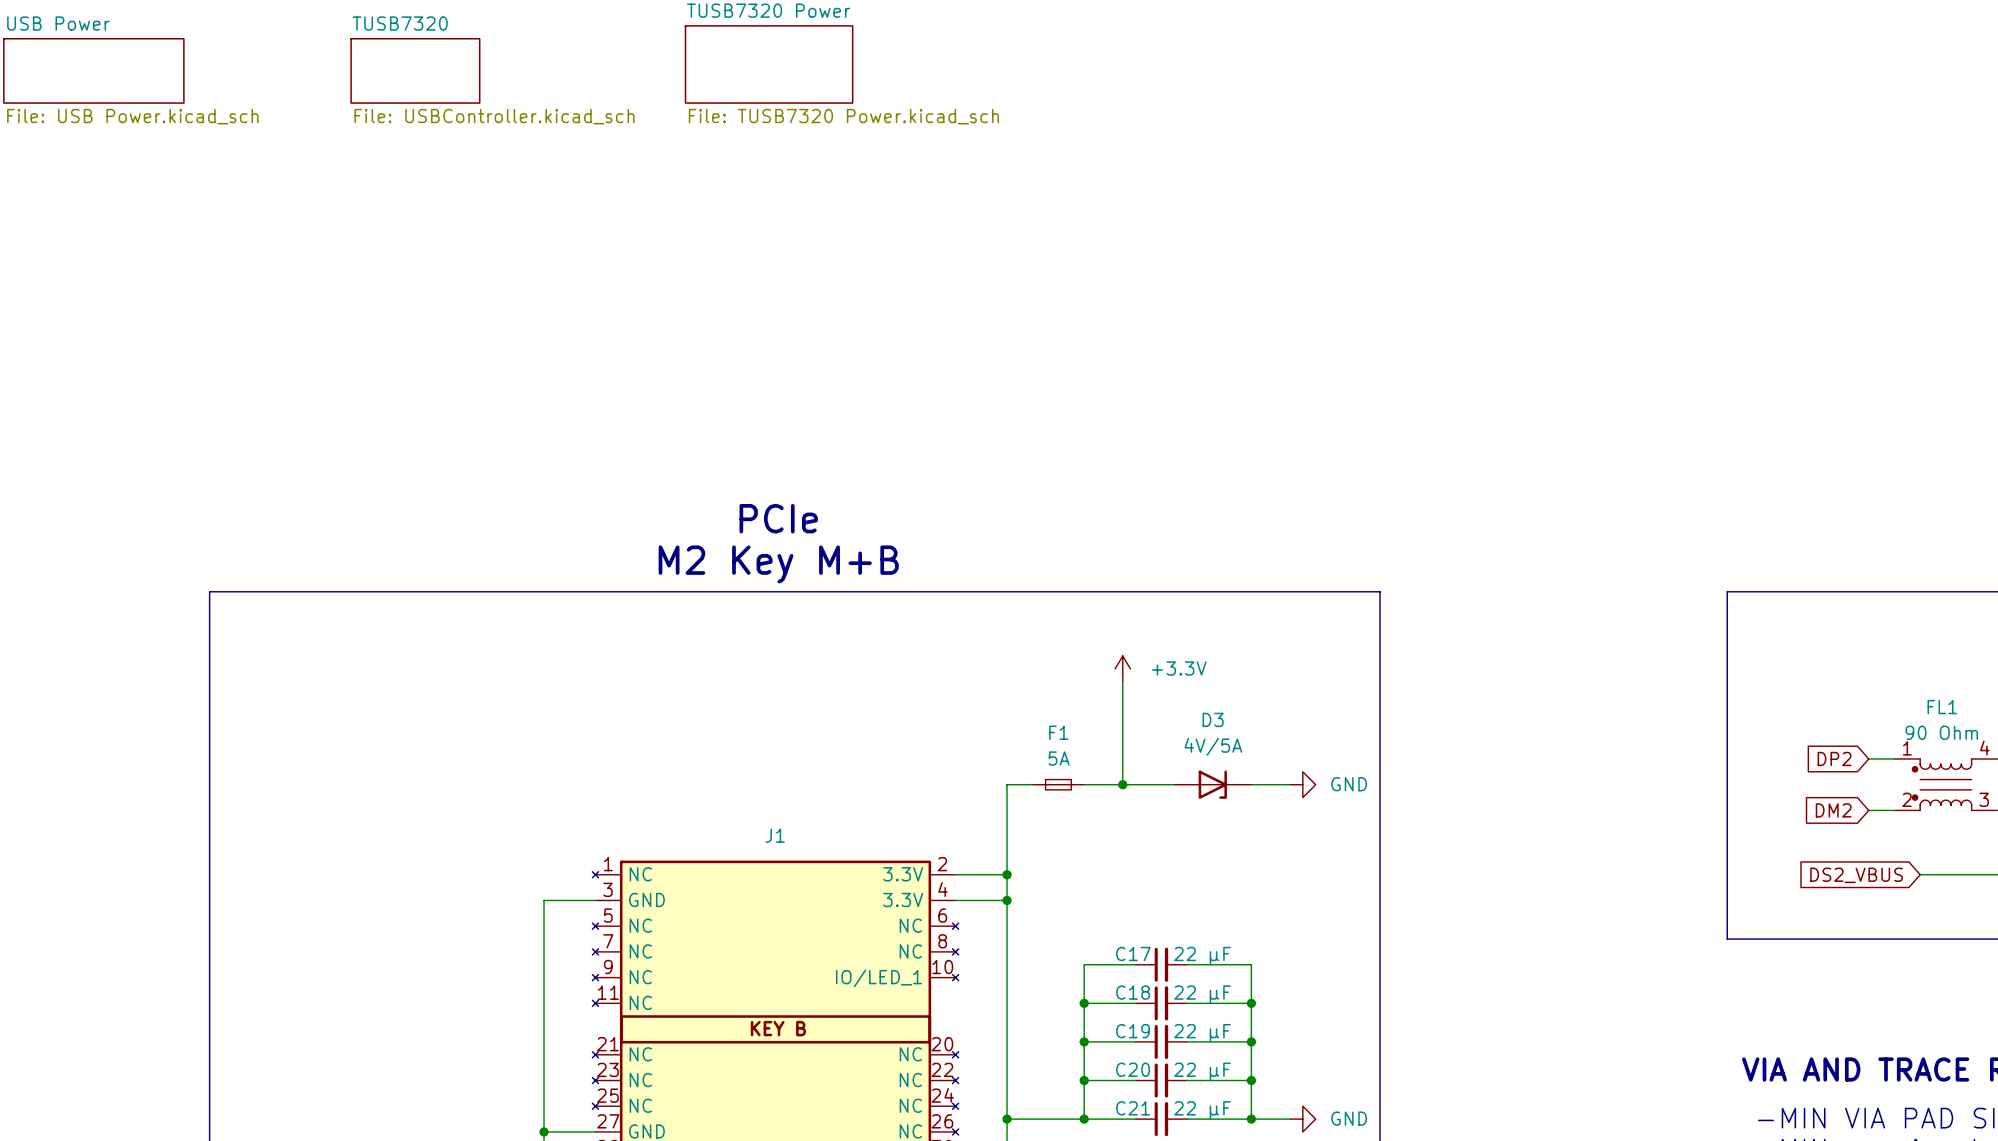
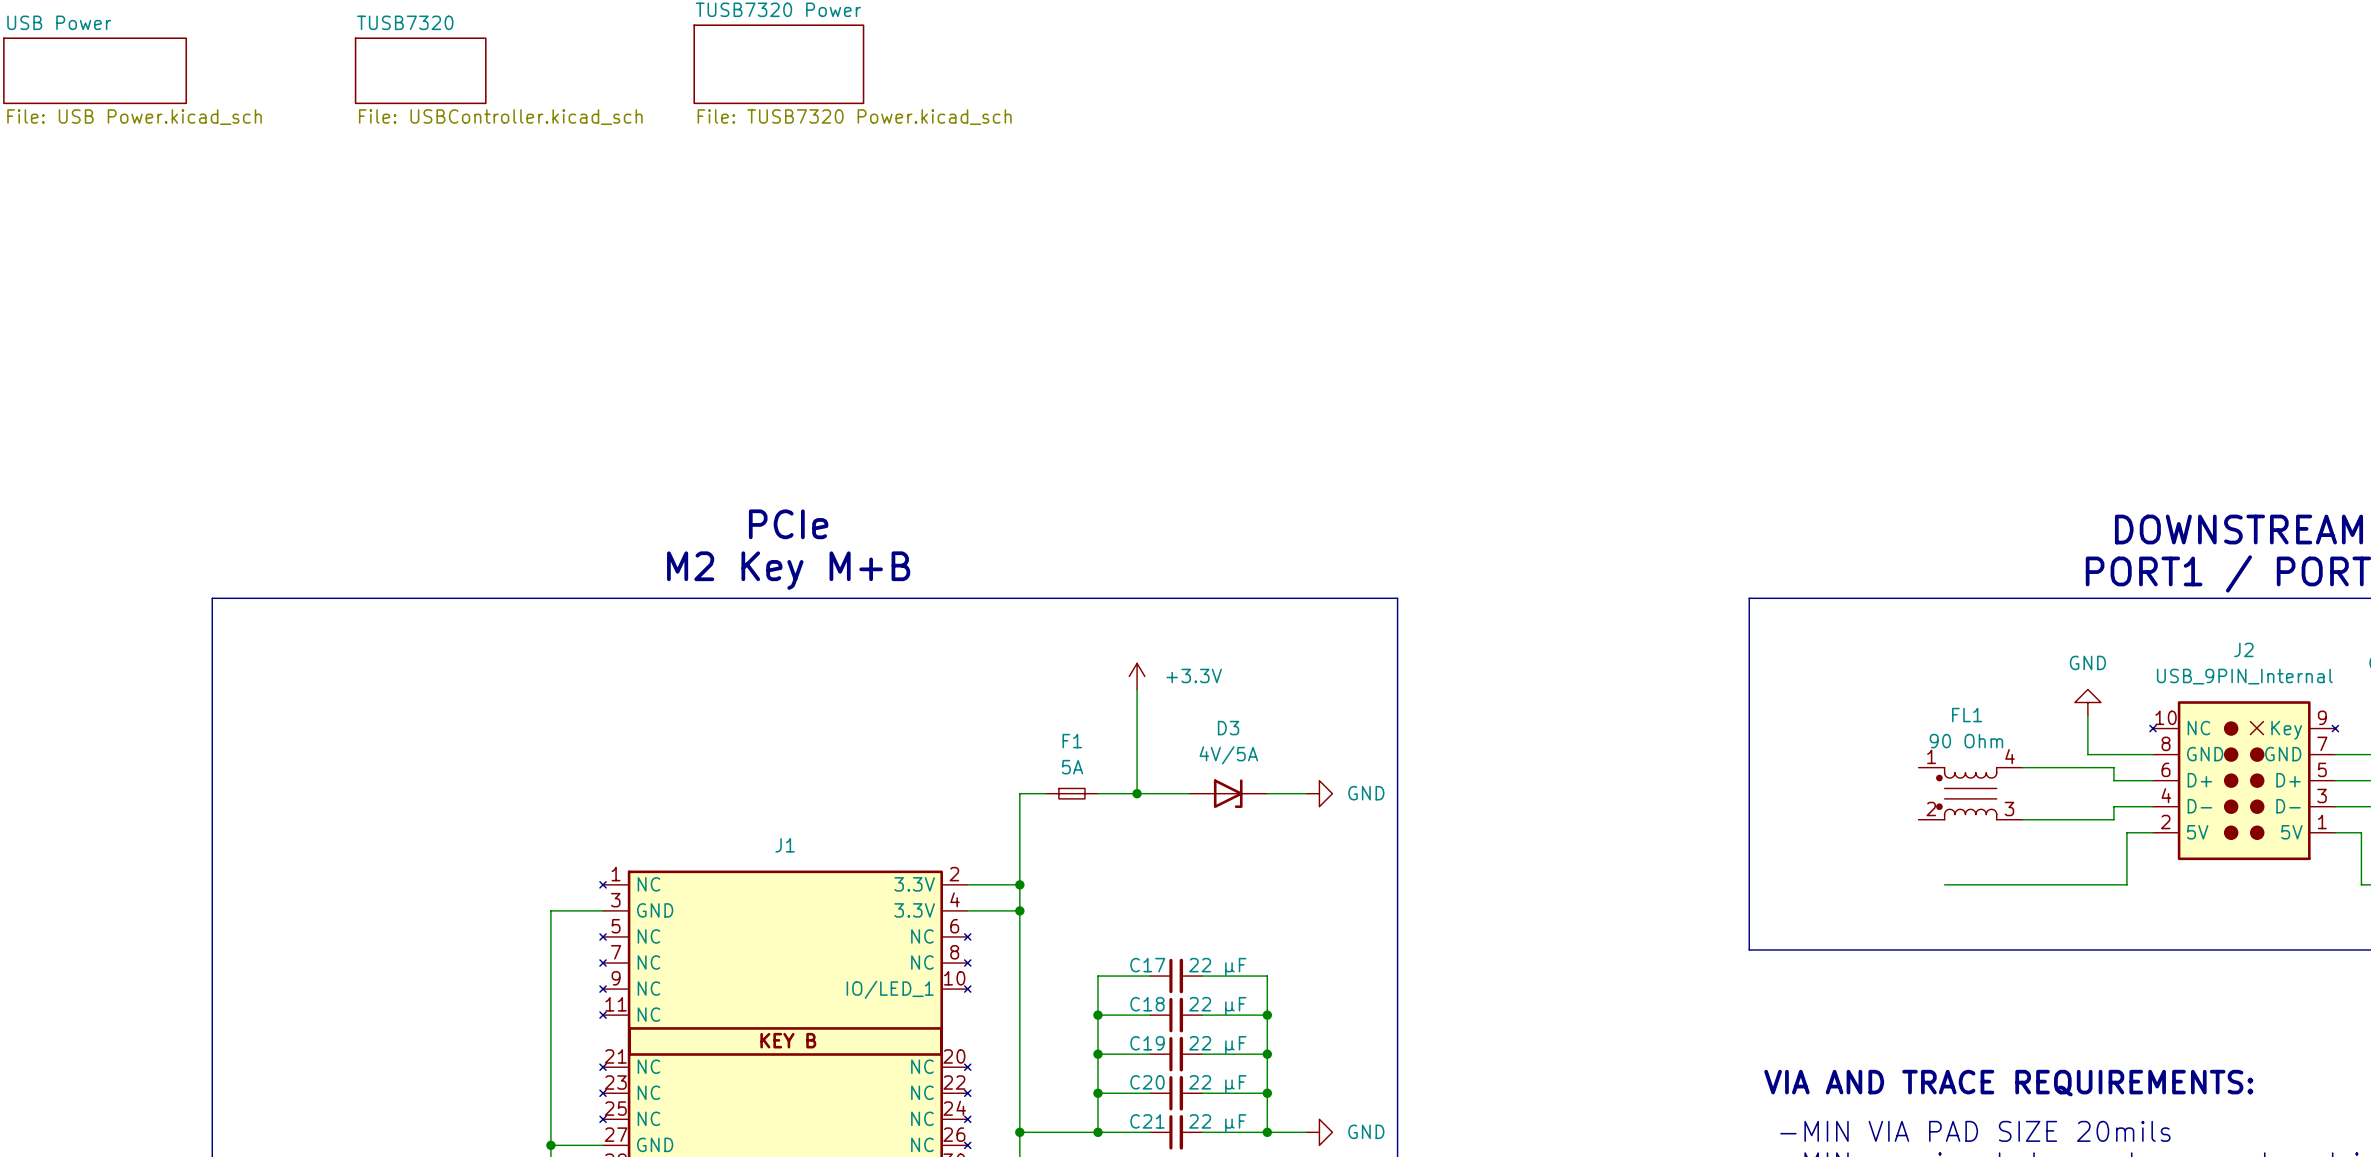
global label: DP2 (1834, 758) -> none
wire: (1868, 758) (1894, 758) -> none
global label: DM2 (1833, 810) -> none
wire: (1868, 810) (1894, 810) -> none
global label: DS2_VBUS (1856, 875) -> none

